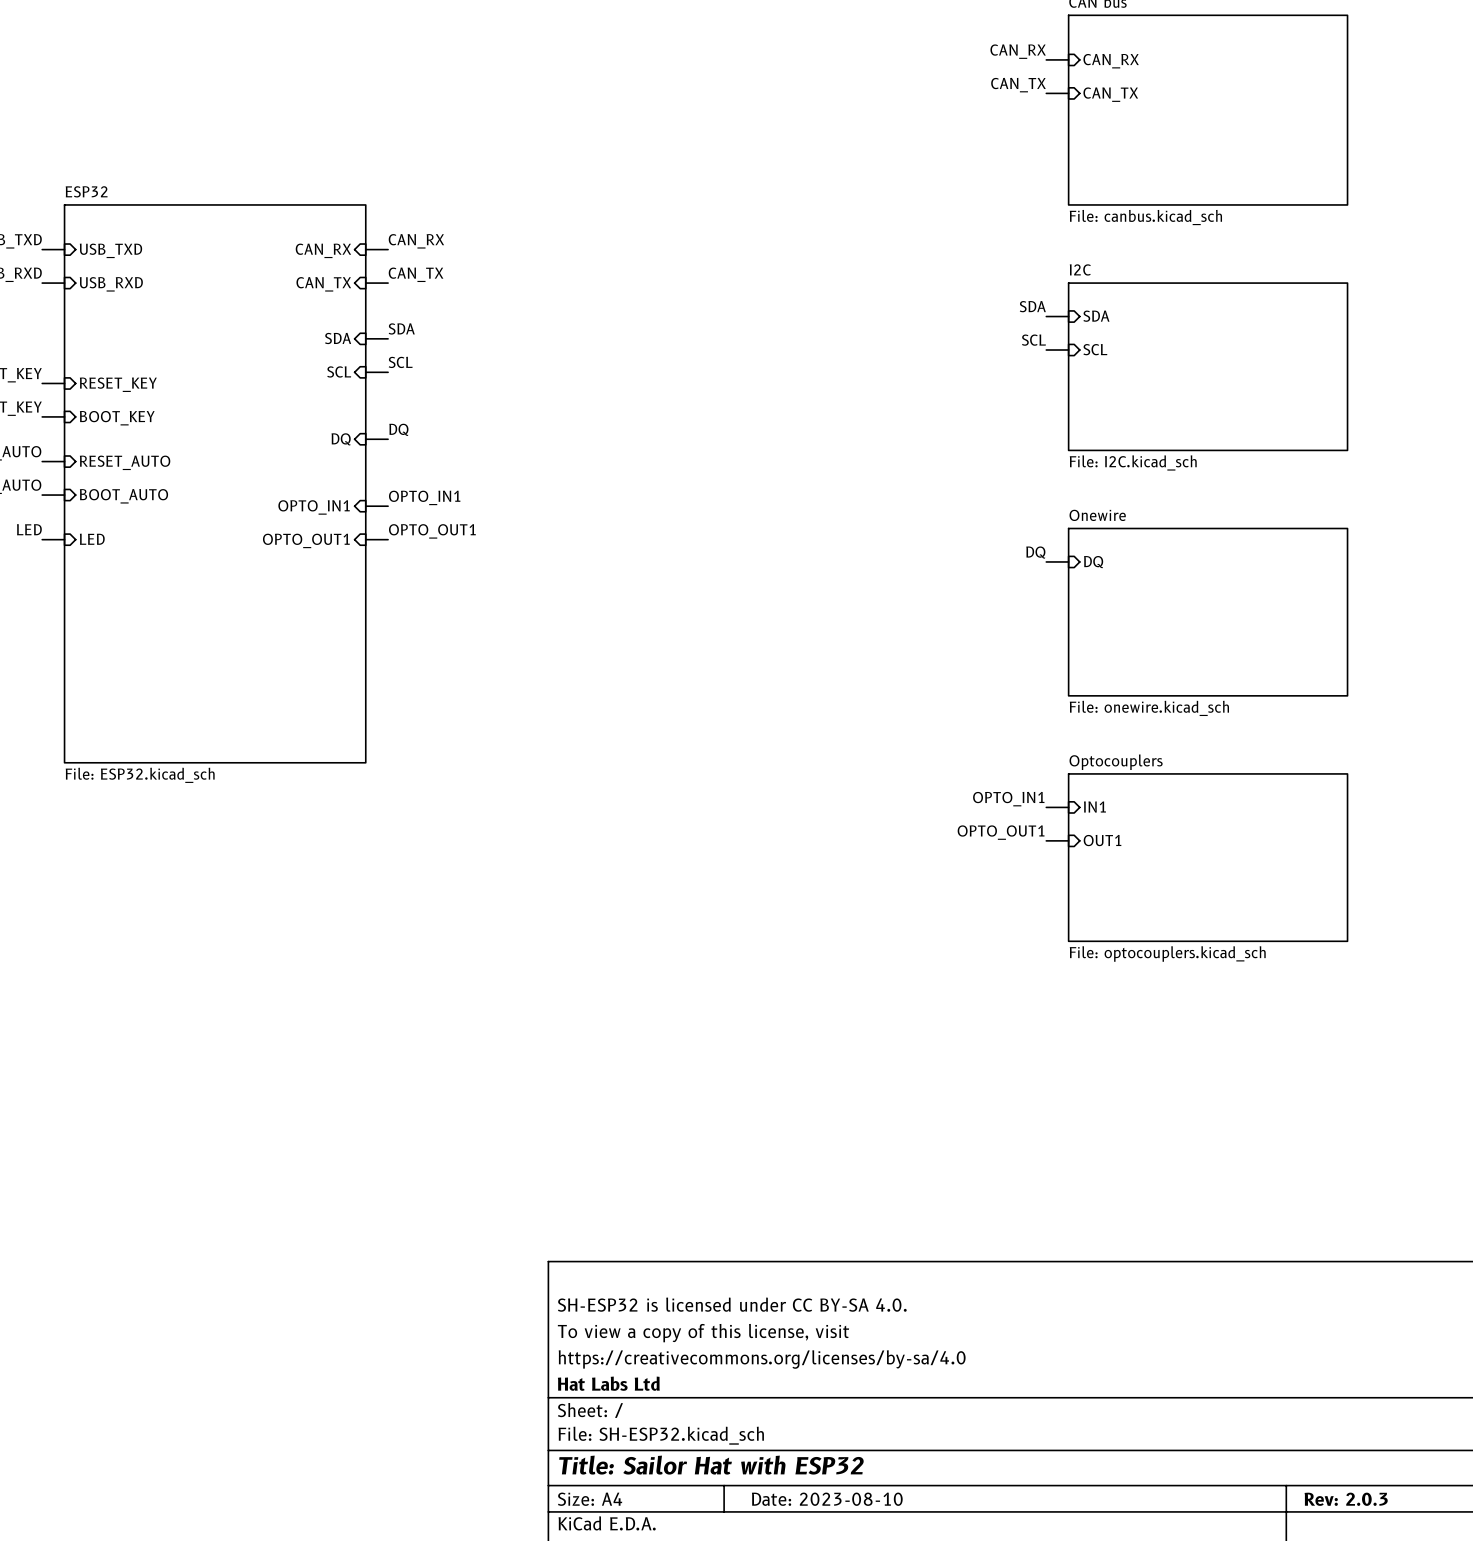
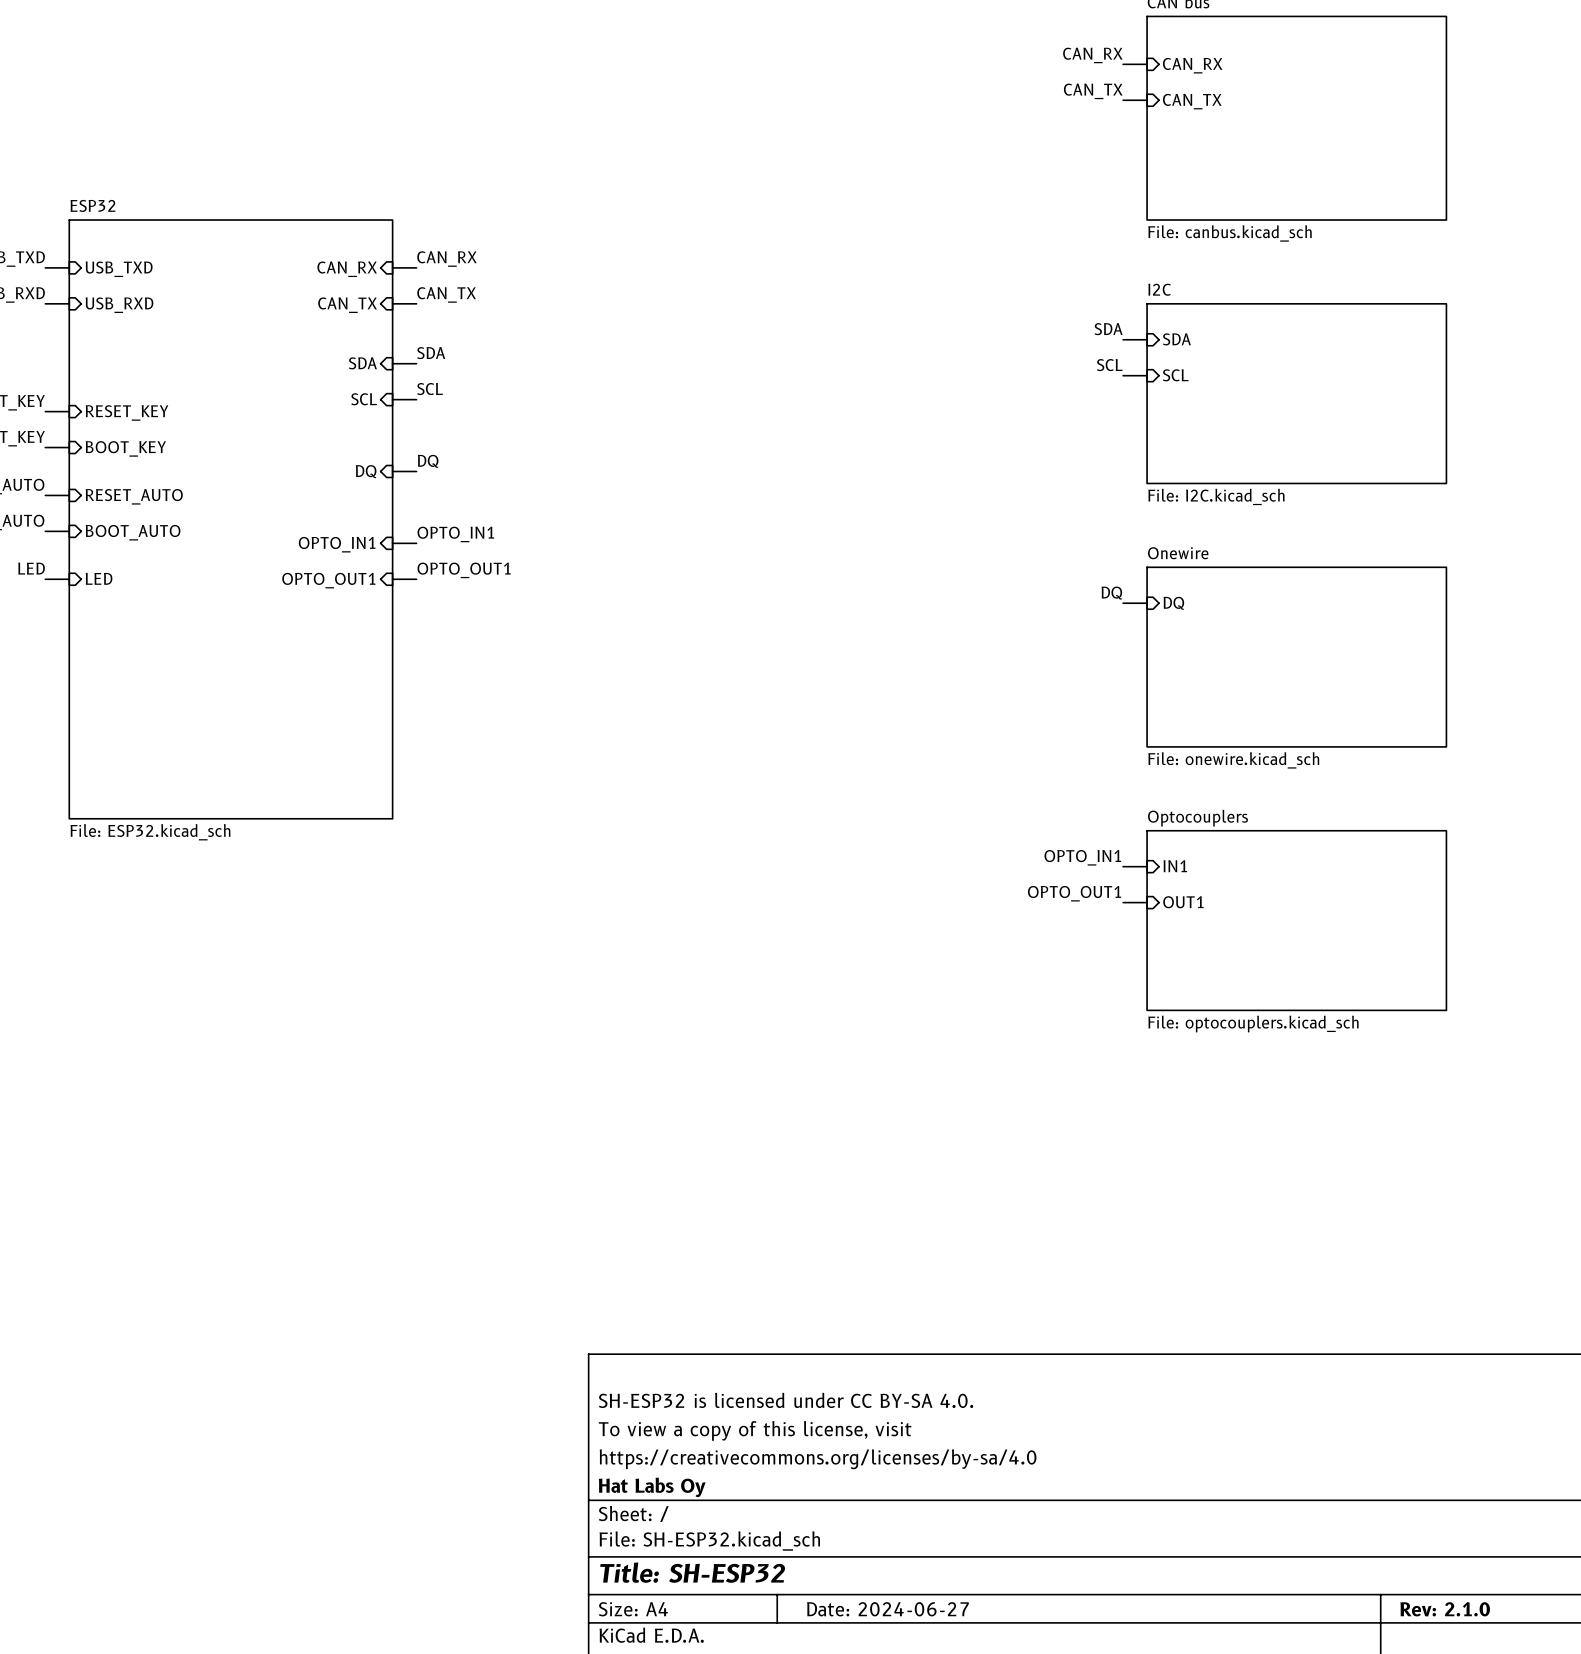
title block: Hat Labs Ltd (608, 1383) -> Hat Labs Oy (652, 1487)
title block: Title: Sailor Hat with ESP32 (711, 1465) -> Title: SH-ESP32 (692, 1572)
title block: Date: 2023-08-10 (827, 1499) -> Date: 2024-06-27 (887, 1609)
title block: Rev: 2.0.3 (1346, 1499) -> Rev: 2.1.0 (1445, 1609)

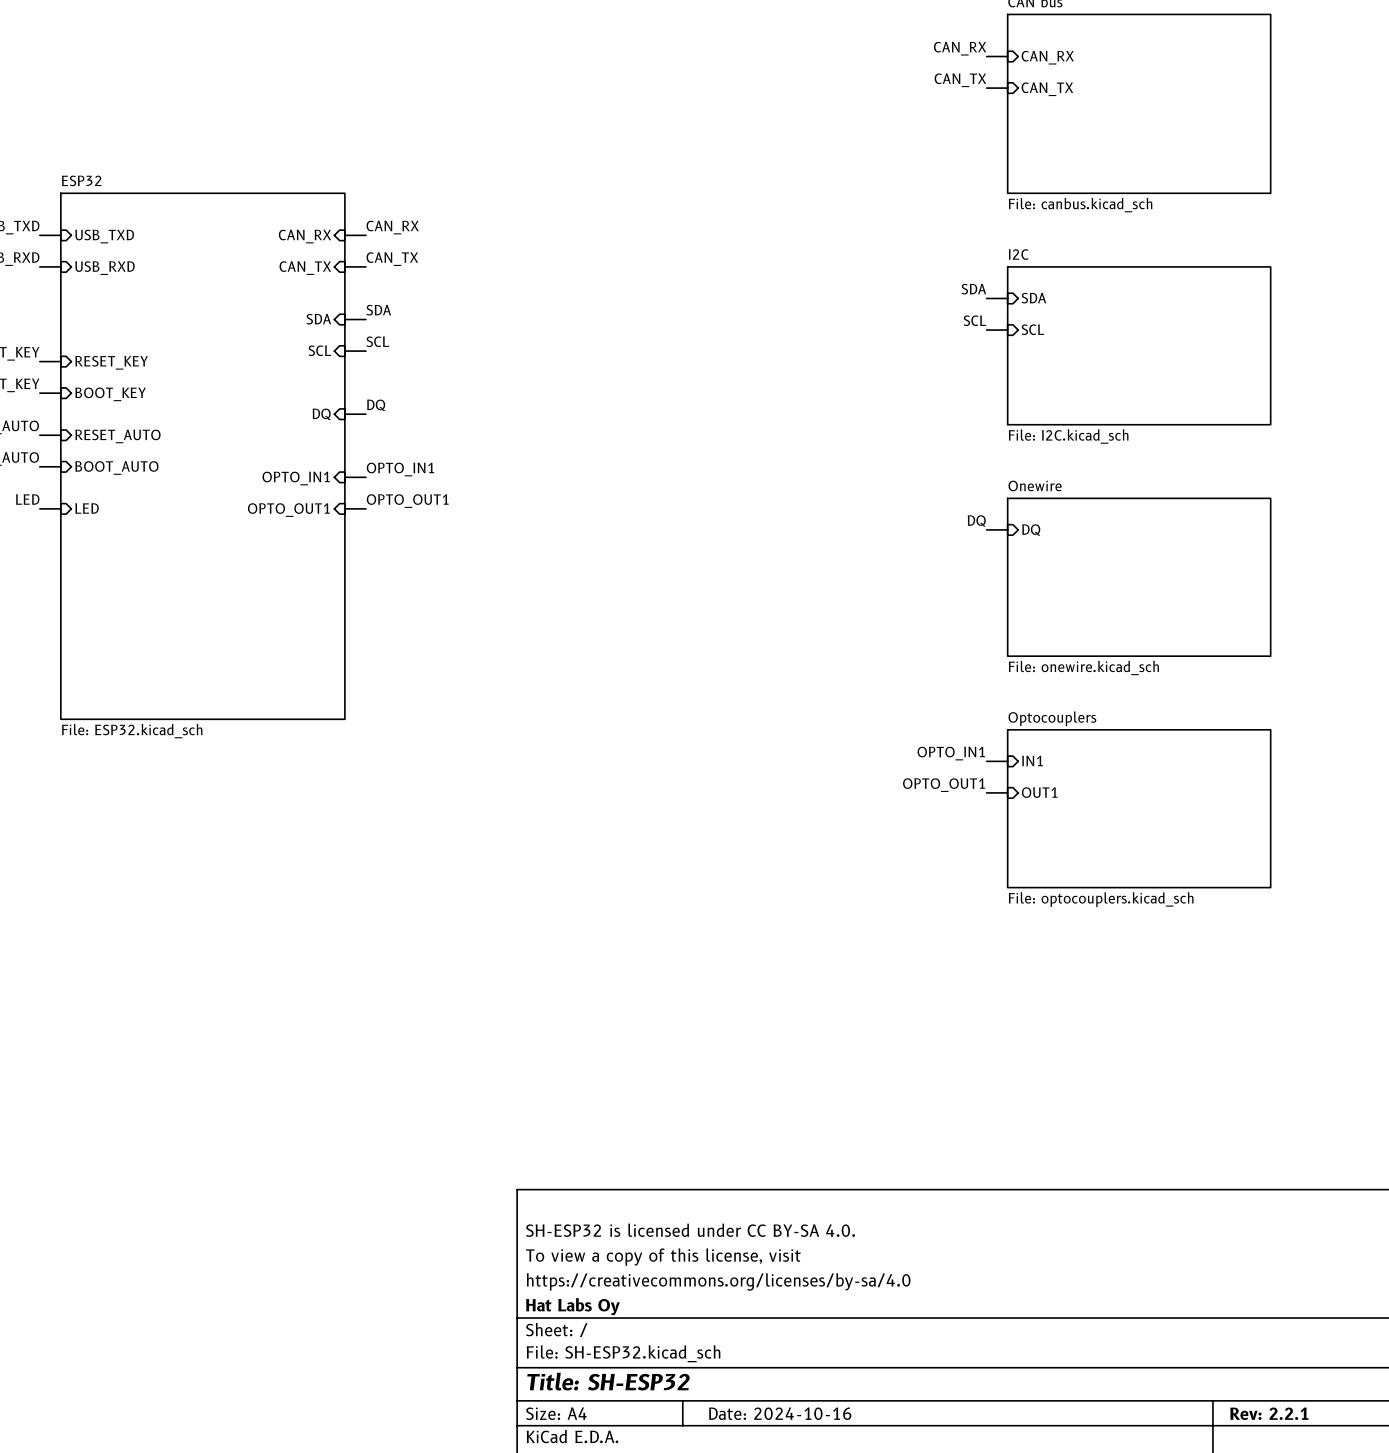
title block: Date: 2024-06-27 (887, 1609) -> Date: 2024-10-16 (780, 1413)
title block: Rev: 2.1.0 (1445, 1609) -> Rev: 2.2.1 (1269, 1413)

